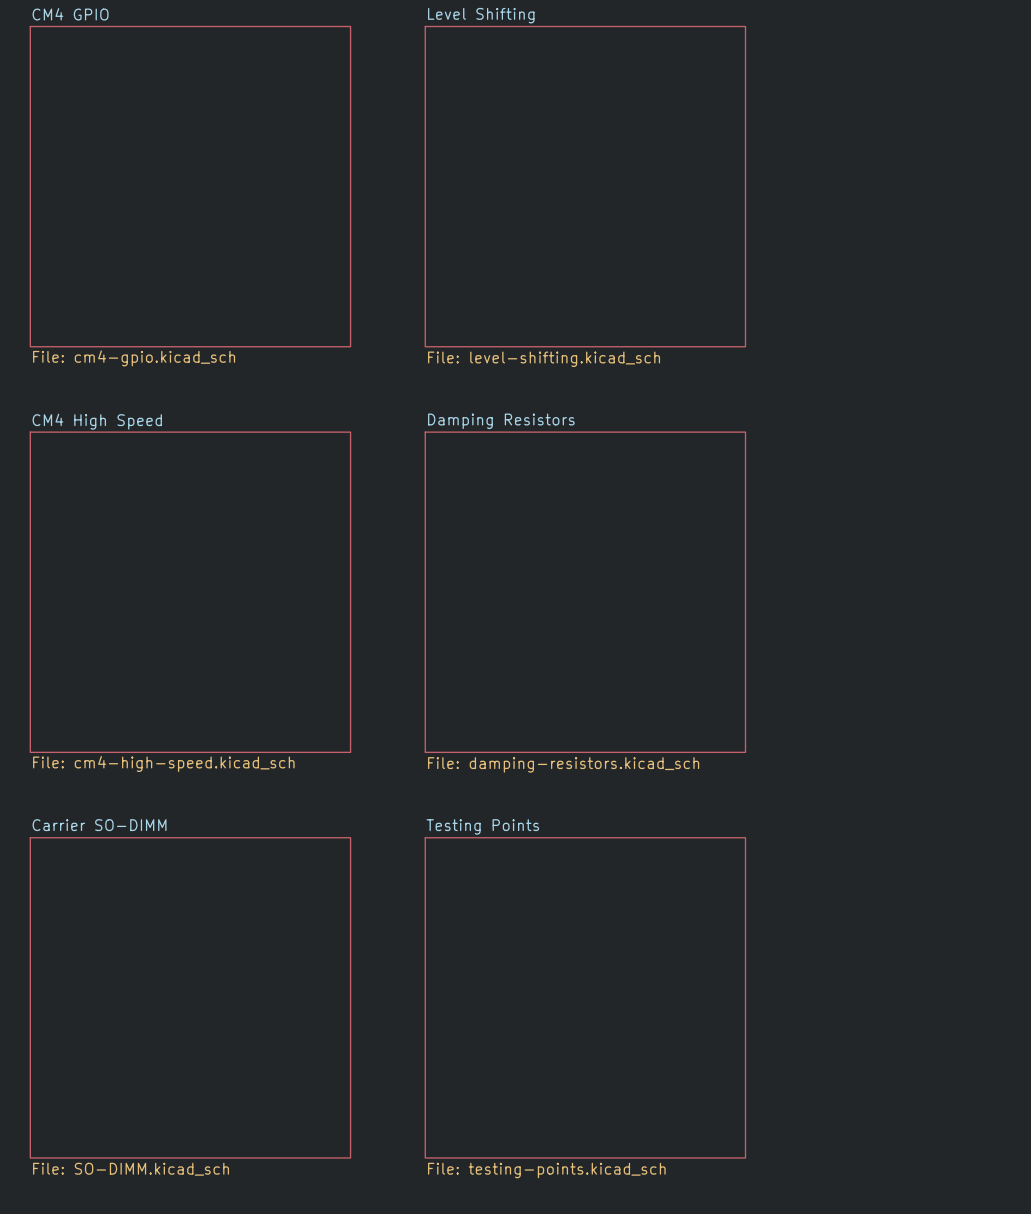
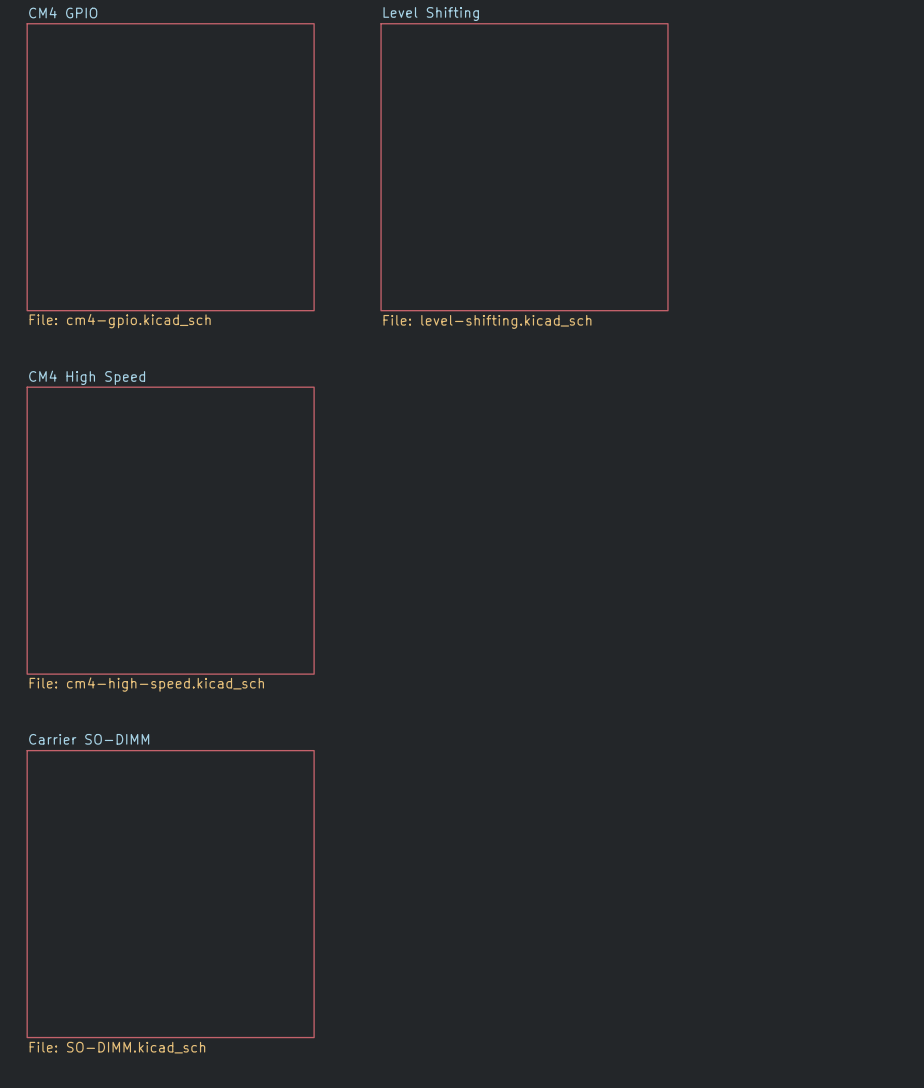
sheet Damping Resistors: File: damping-resistors.kicad_sch (585, 592) -> none
sheet Testing Points: File: testing-points.kicad_sch (585, 997) -> none

